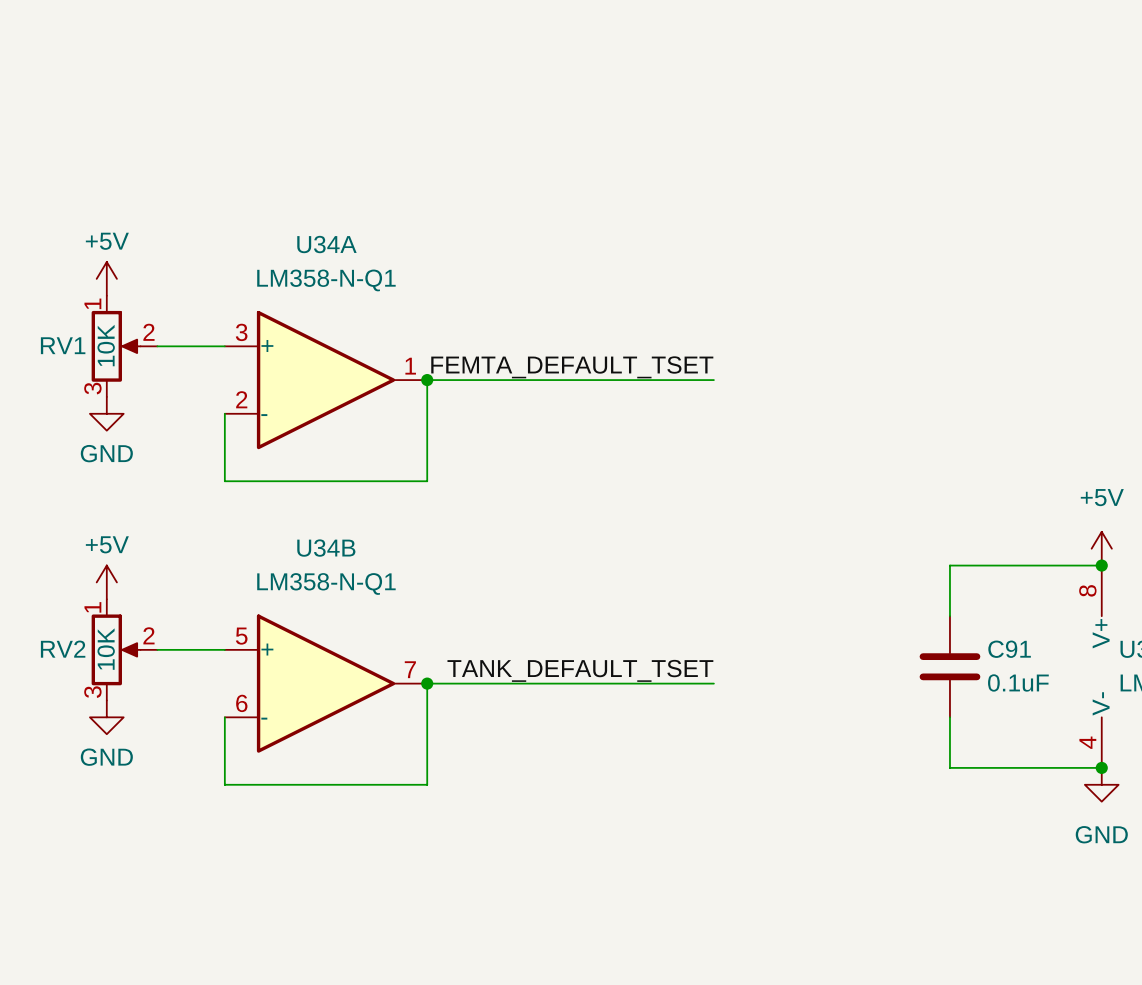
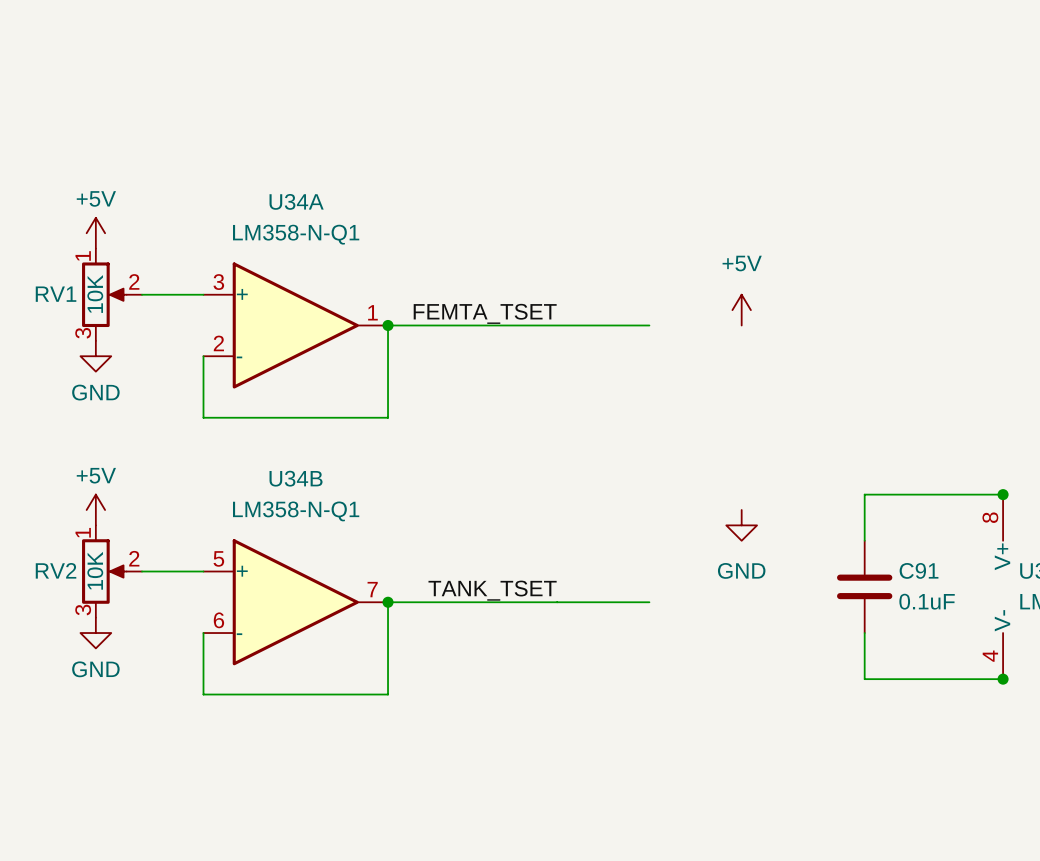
power symbol: none -> +5V (741, 310)
label: FEMTA_DEFAULT_TSET (572, 367) -> FEMTA_TSET (485, 313)
power symbol: +5V (1101, 548) -> none
power symbol: none -> GND (741, 525)
label: TANK_DEFAULT_TSET (580, 670) -> TANK_TSET (492, 590)
power symbol: GND (1101, 784) -> none

